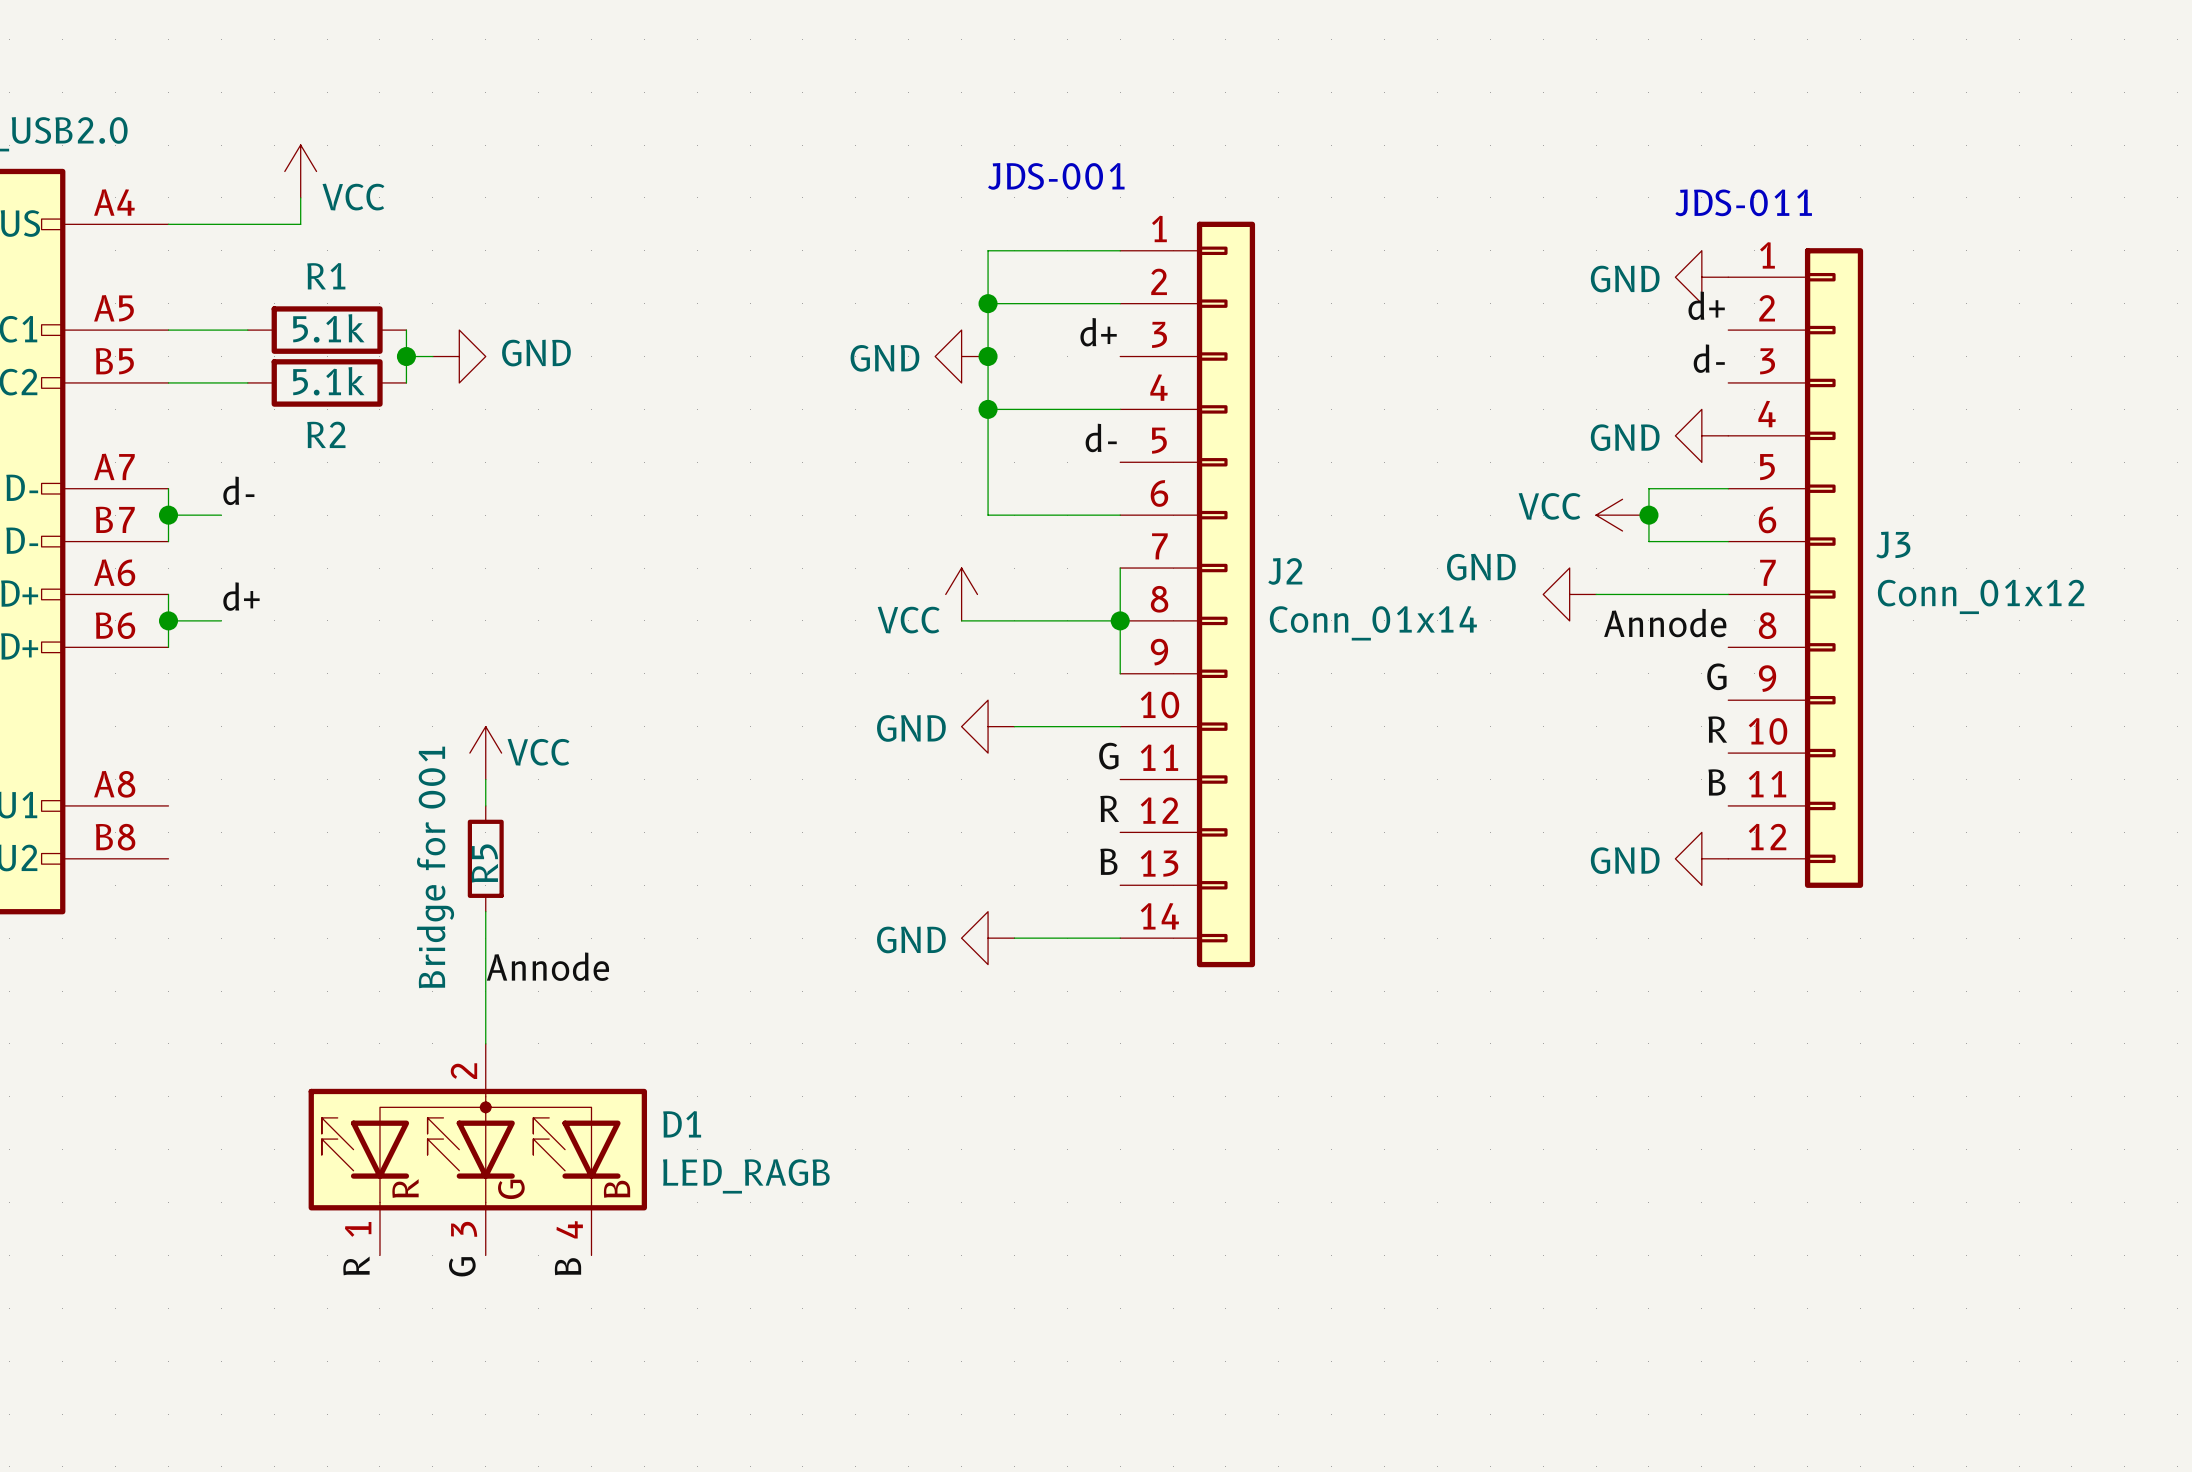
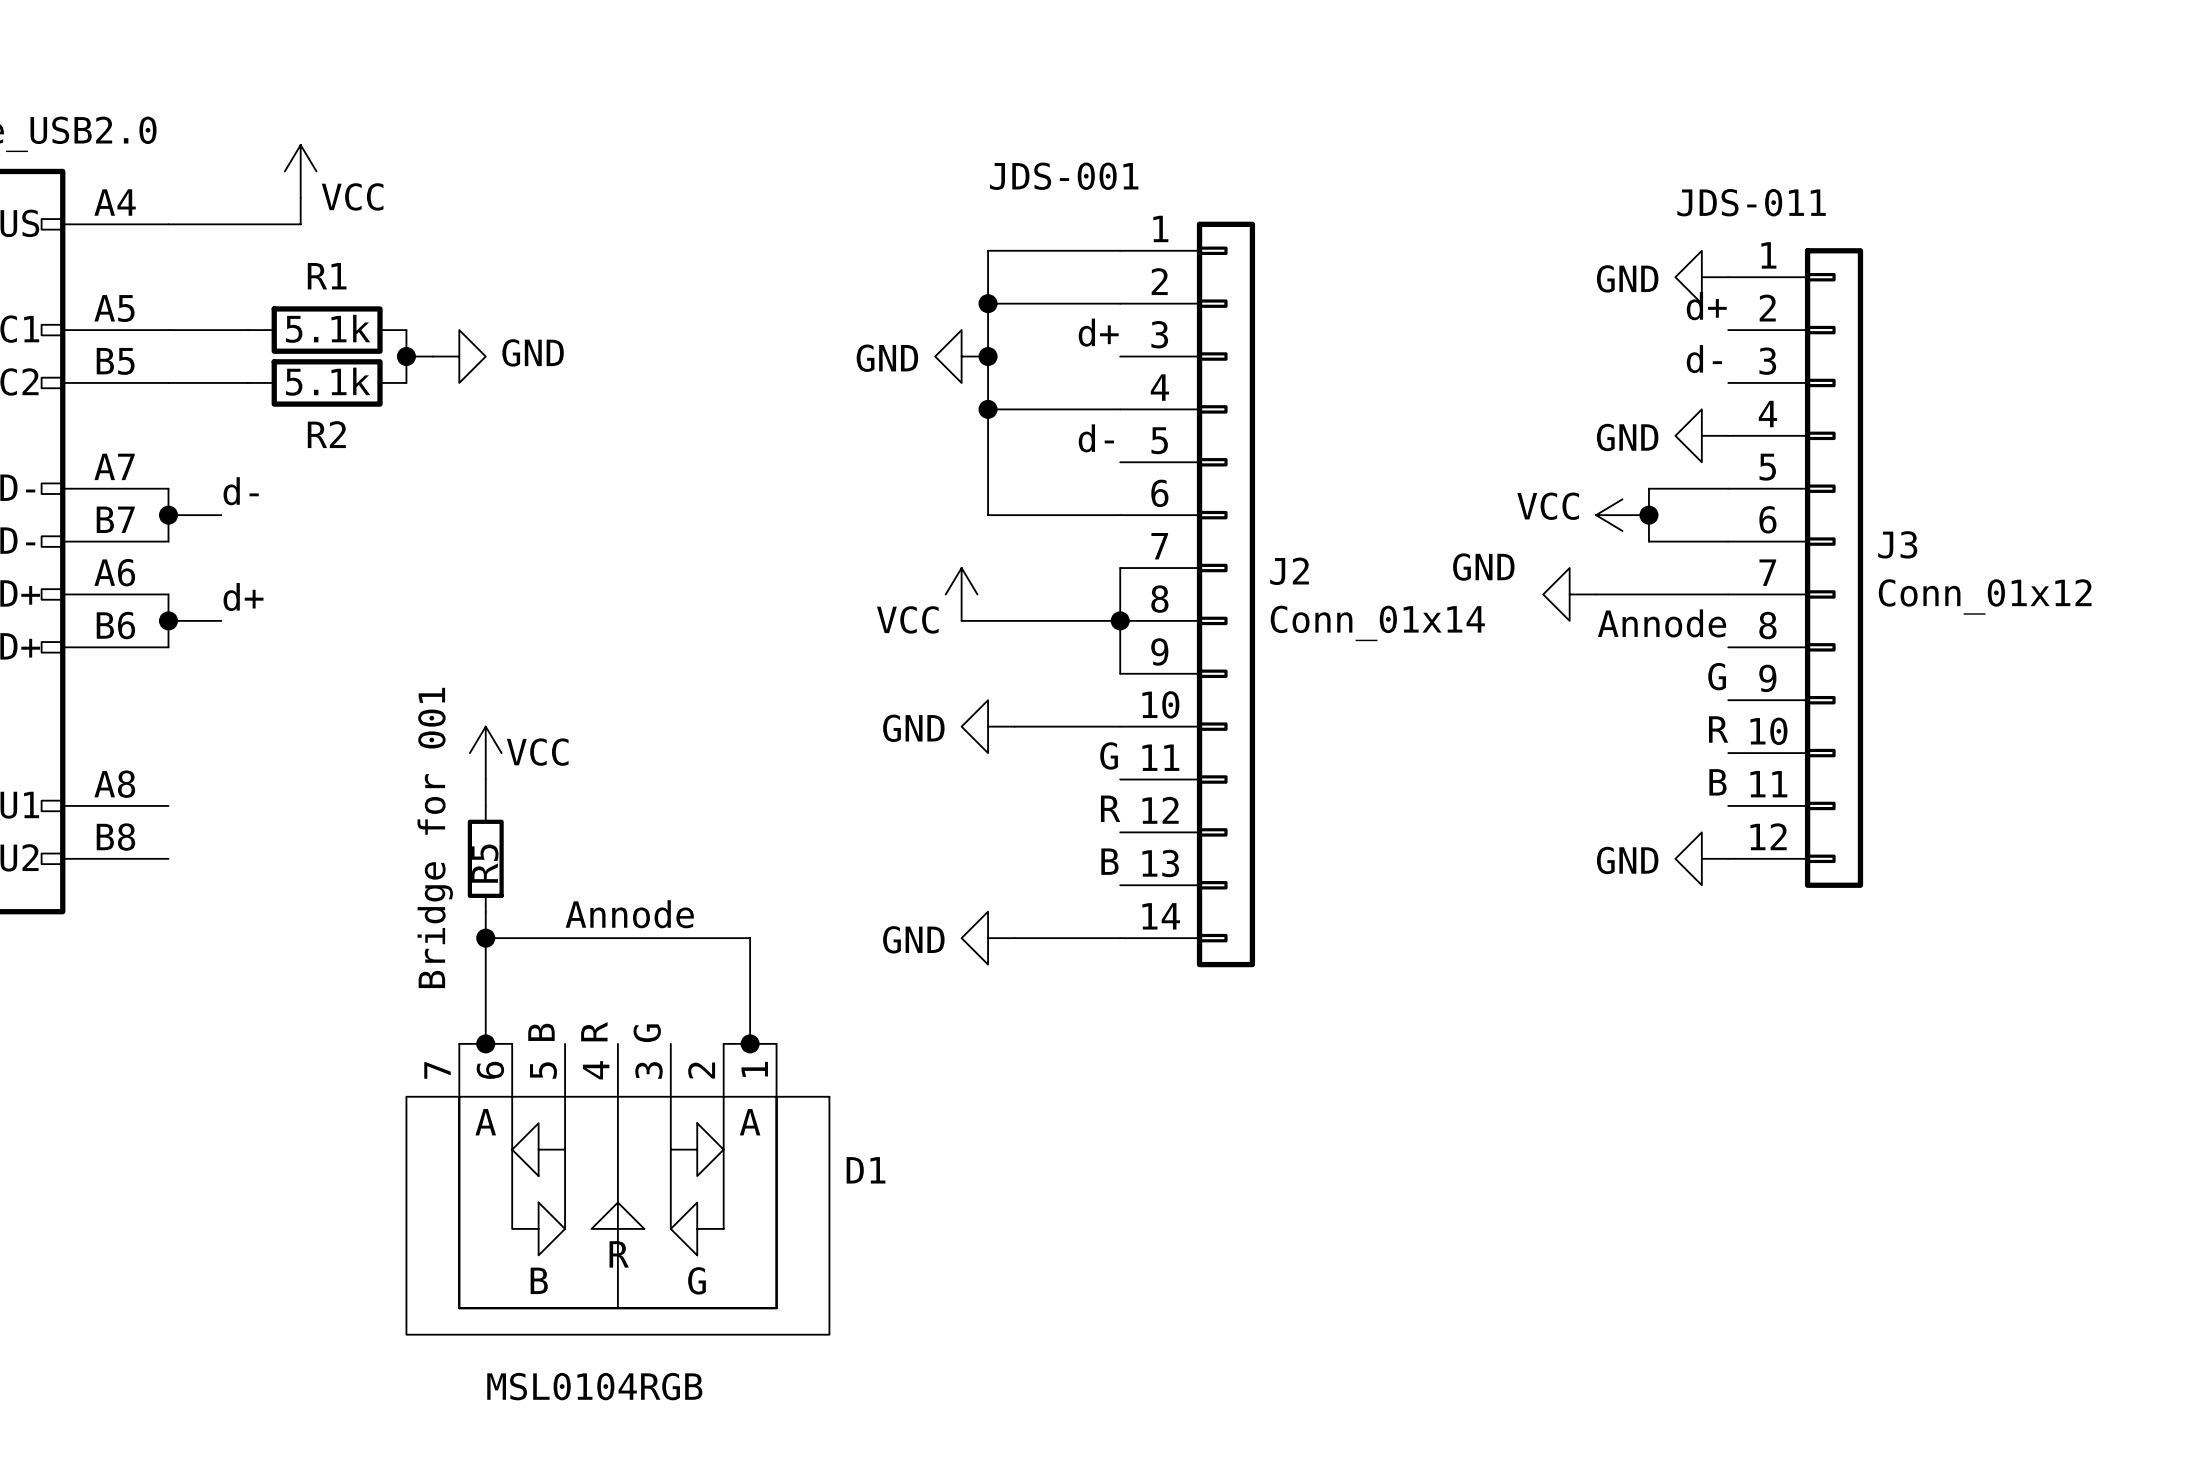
wire: none -> (485, 938) (750, 938) (750, 1043)
junction: none -> (485, 938)
label position: Annode (547, 966) -> Annode (629, 914)
D1 symbol: [308, 1043, 648, 1256] -> [406, 1043, 830, 1335]
wire: none -> (459, 1043) (512, 1043)
junction: none -> (485, 1043)
wire: none -> (723, 1043) (776, 1043)
junction: none -> (750, 1043)
D1 name position: D1 (682, 1124) -> D1 (866, 1170)
D1 value: LED_RAGB (746, 1176) -> MSL0104RGB (594, 1386)
label position: R (356, 1265) -> R (594, 1031)
label position: G (462, 1266) -> G (647, 1033)
label position: B (567, 1266) -> B (541, 1032)

